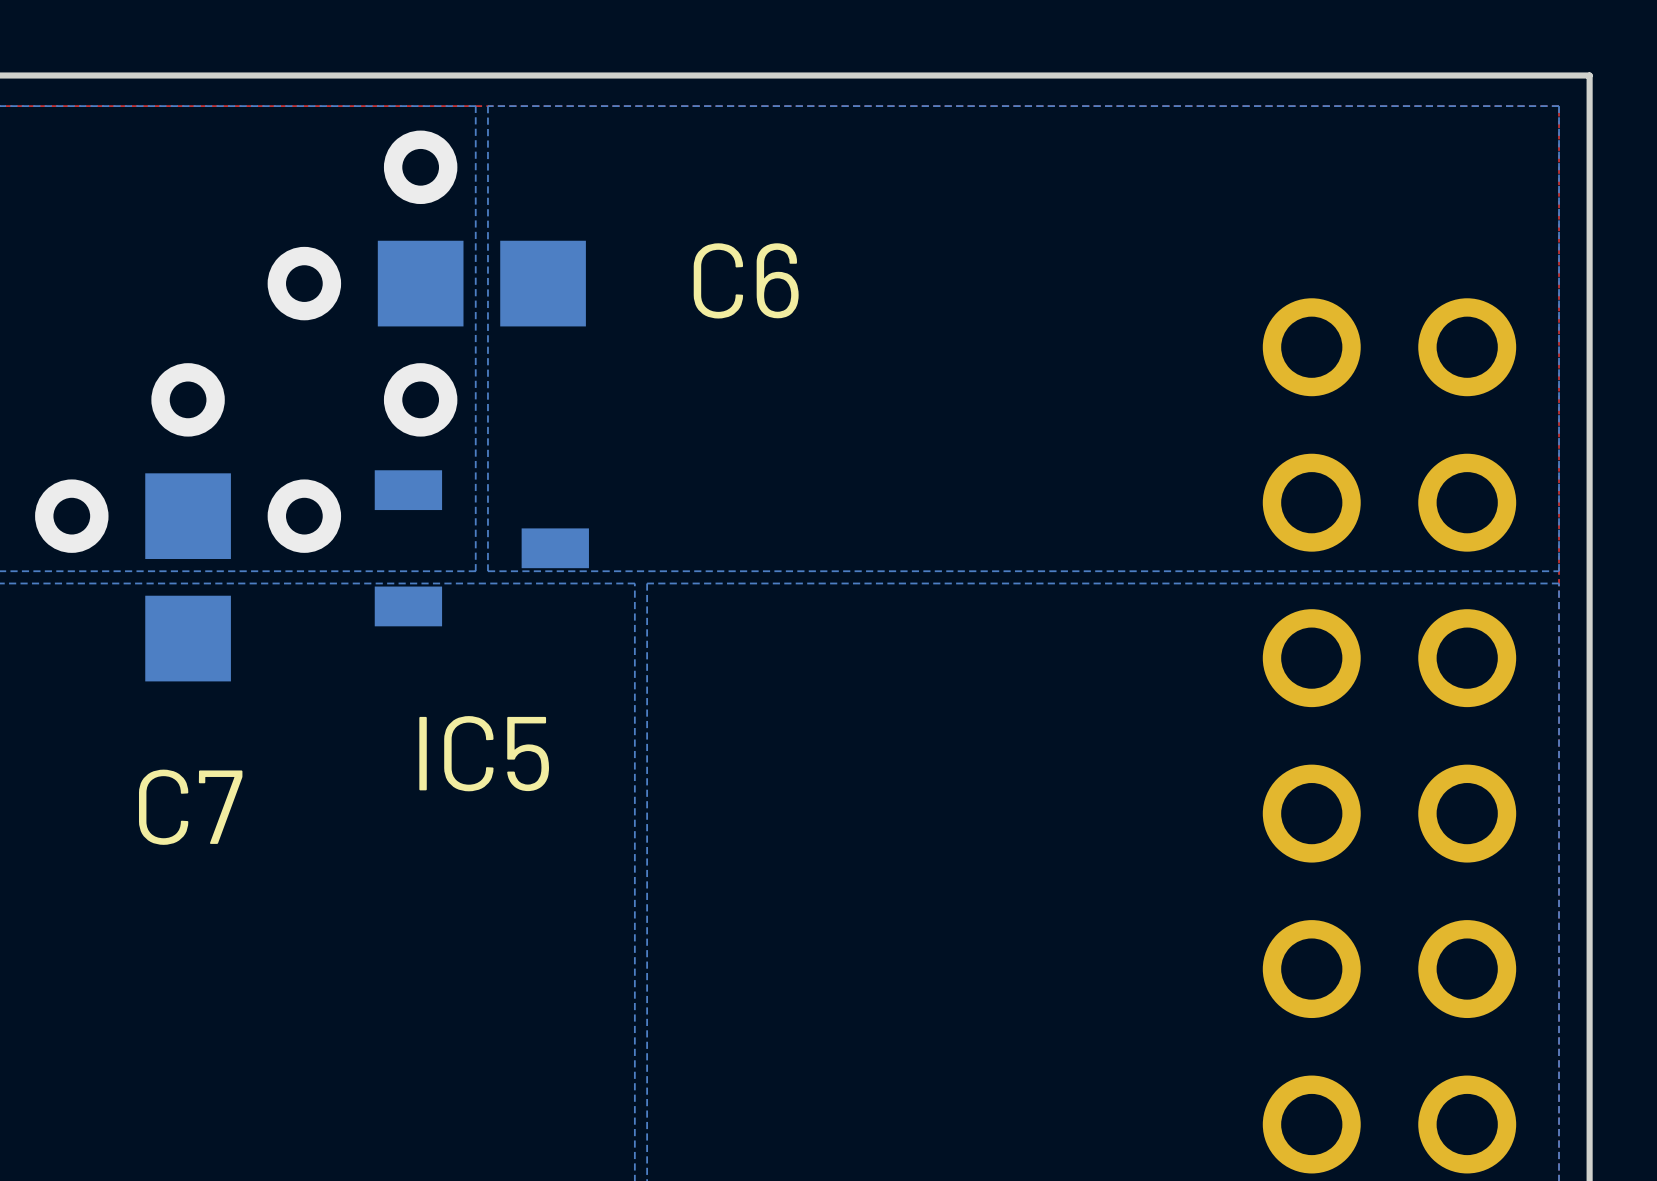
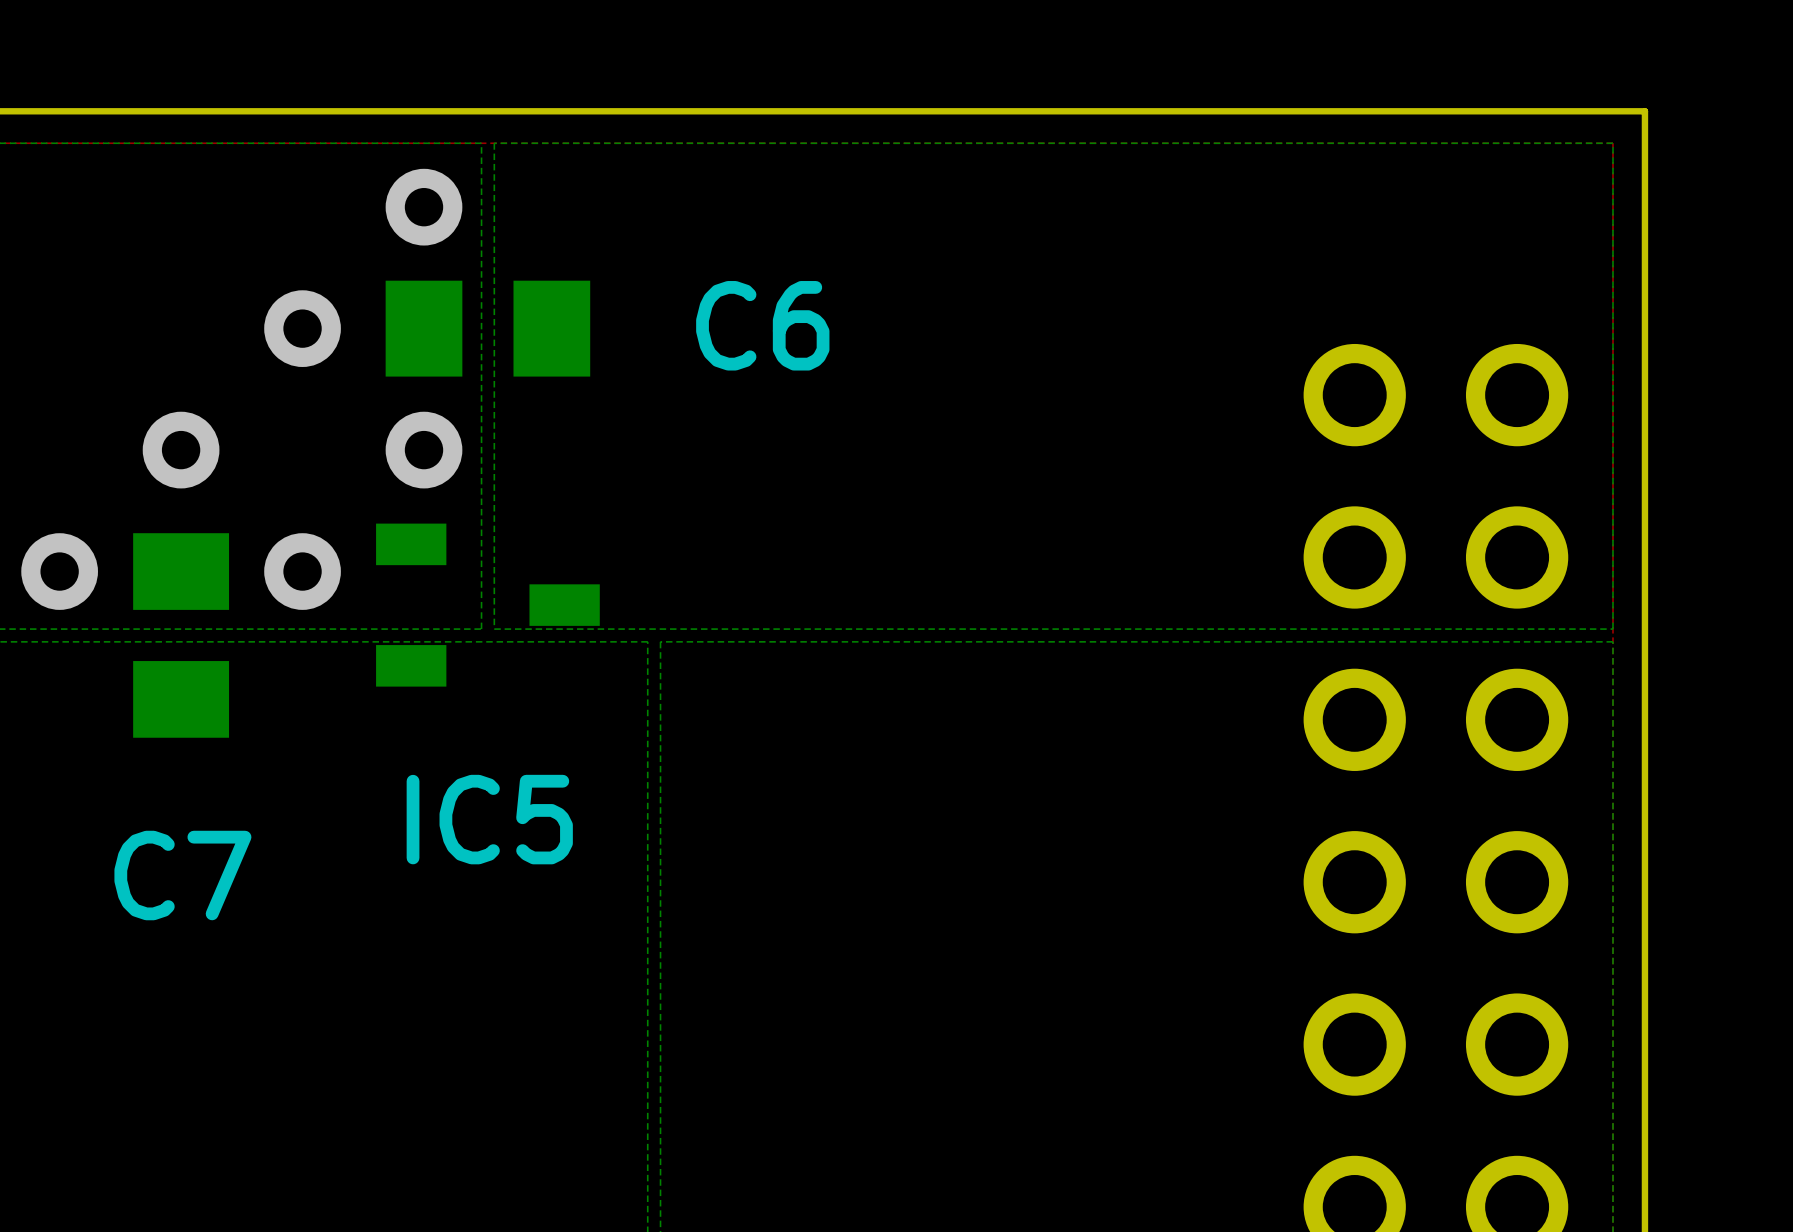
C6 footprint: [377, 240, 586, 327] -> [385, 280, 591, 377]
C7 footprint: [145, 473, 231, 682] -> [133, 533, 230, 738]

